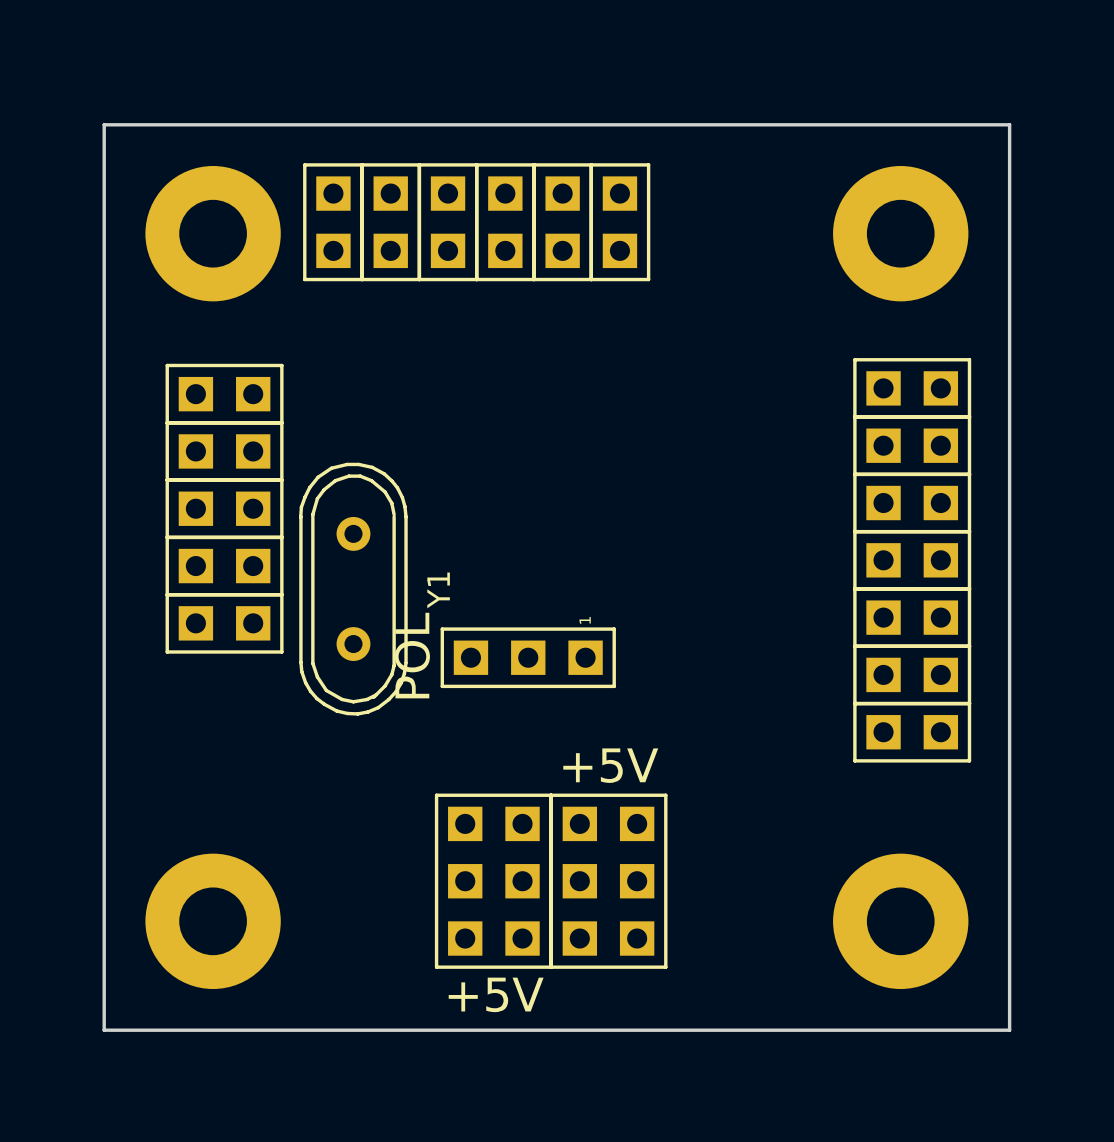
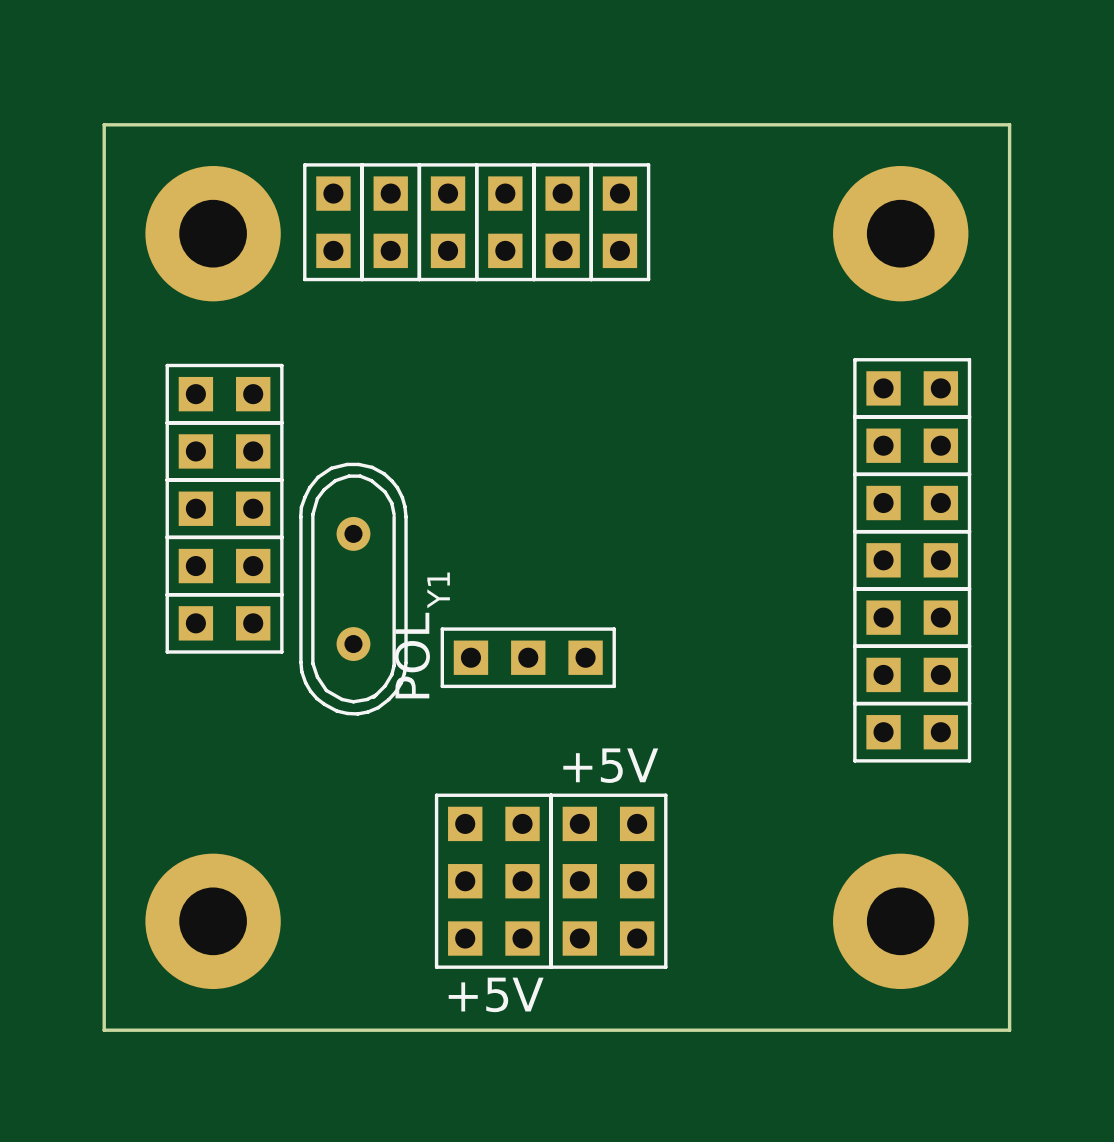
part text: 1 (585, 620) -> none

